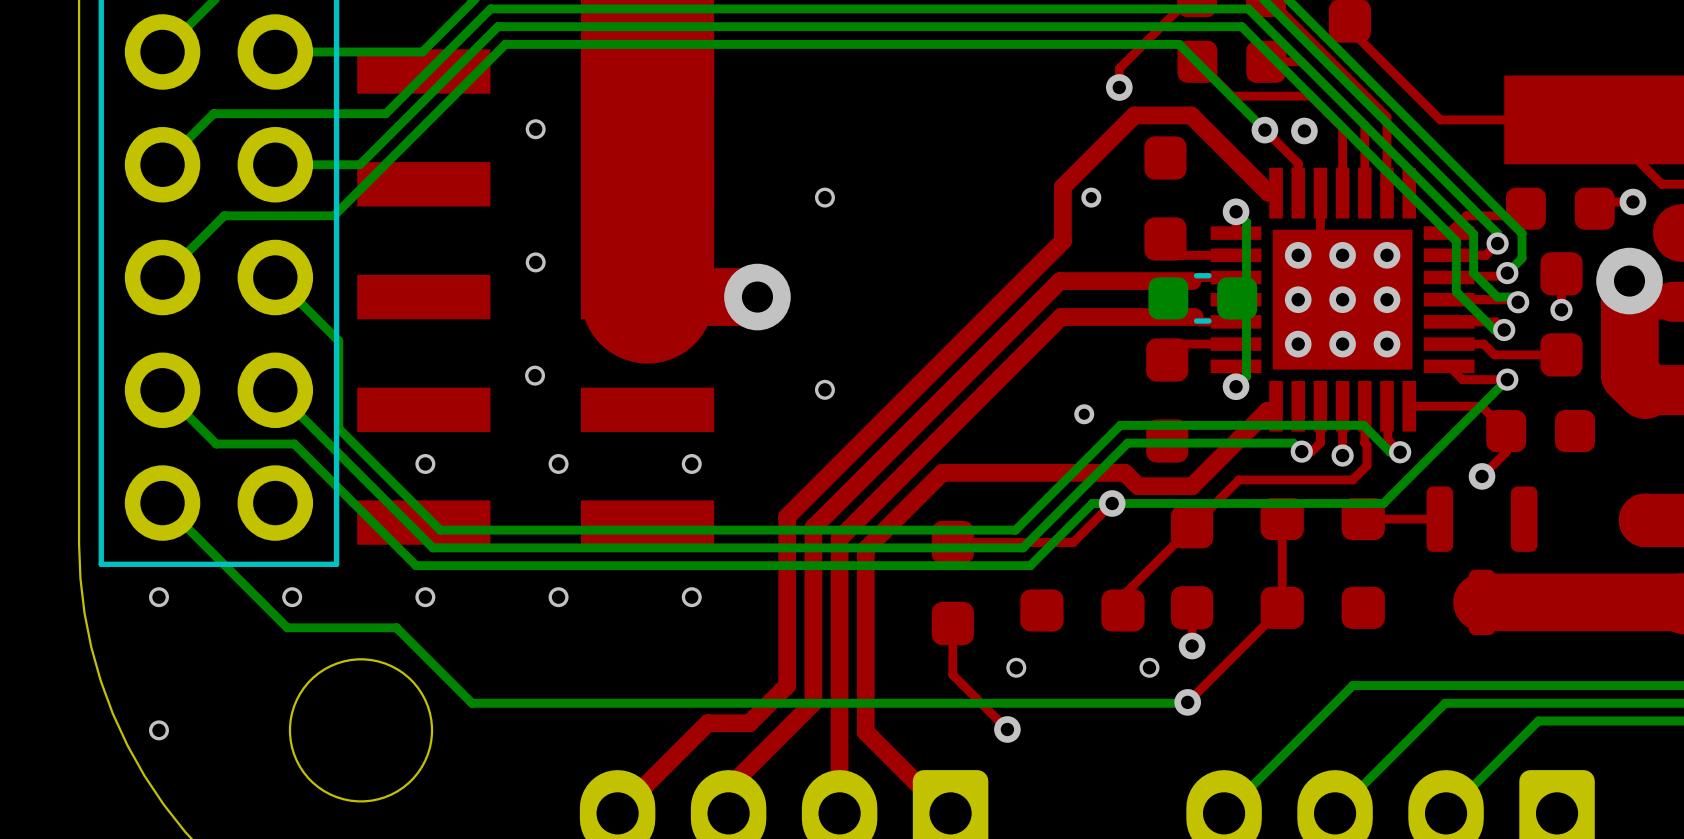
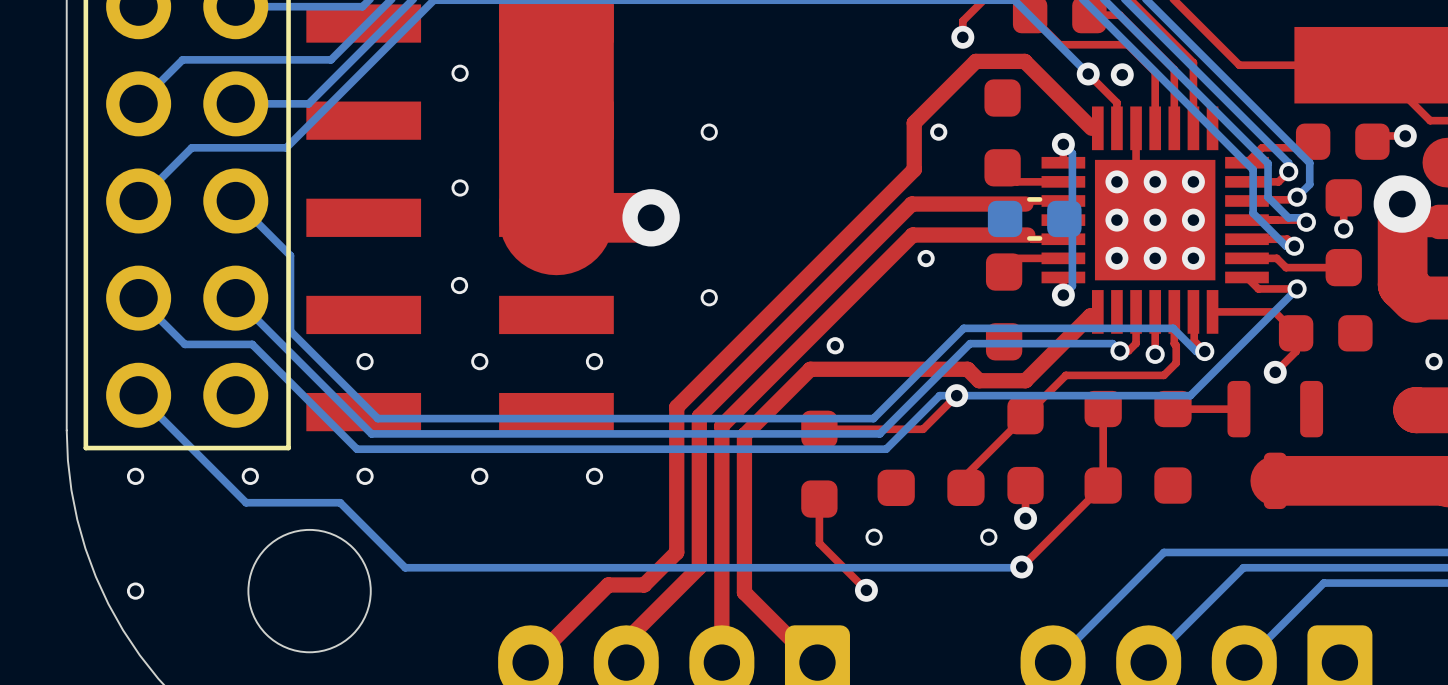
via: none -> (926, 258)
via: (1084, 414) -> none
via: none -> (835, 345)
via: none -> (1433, 361)

